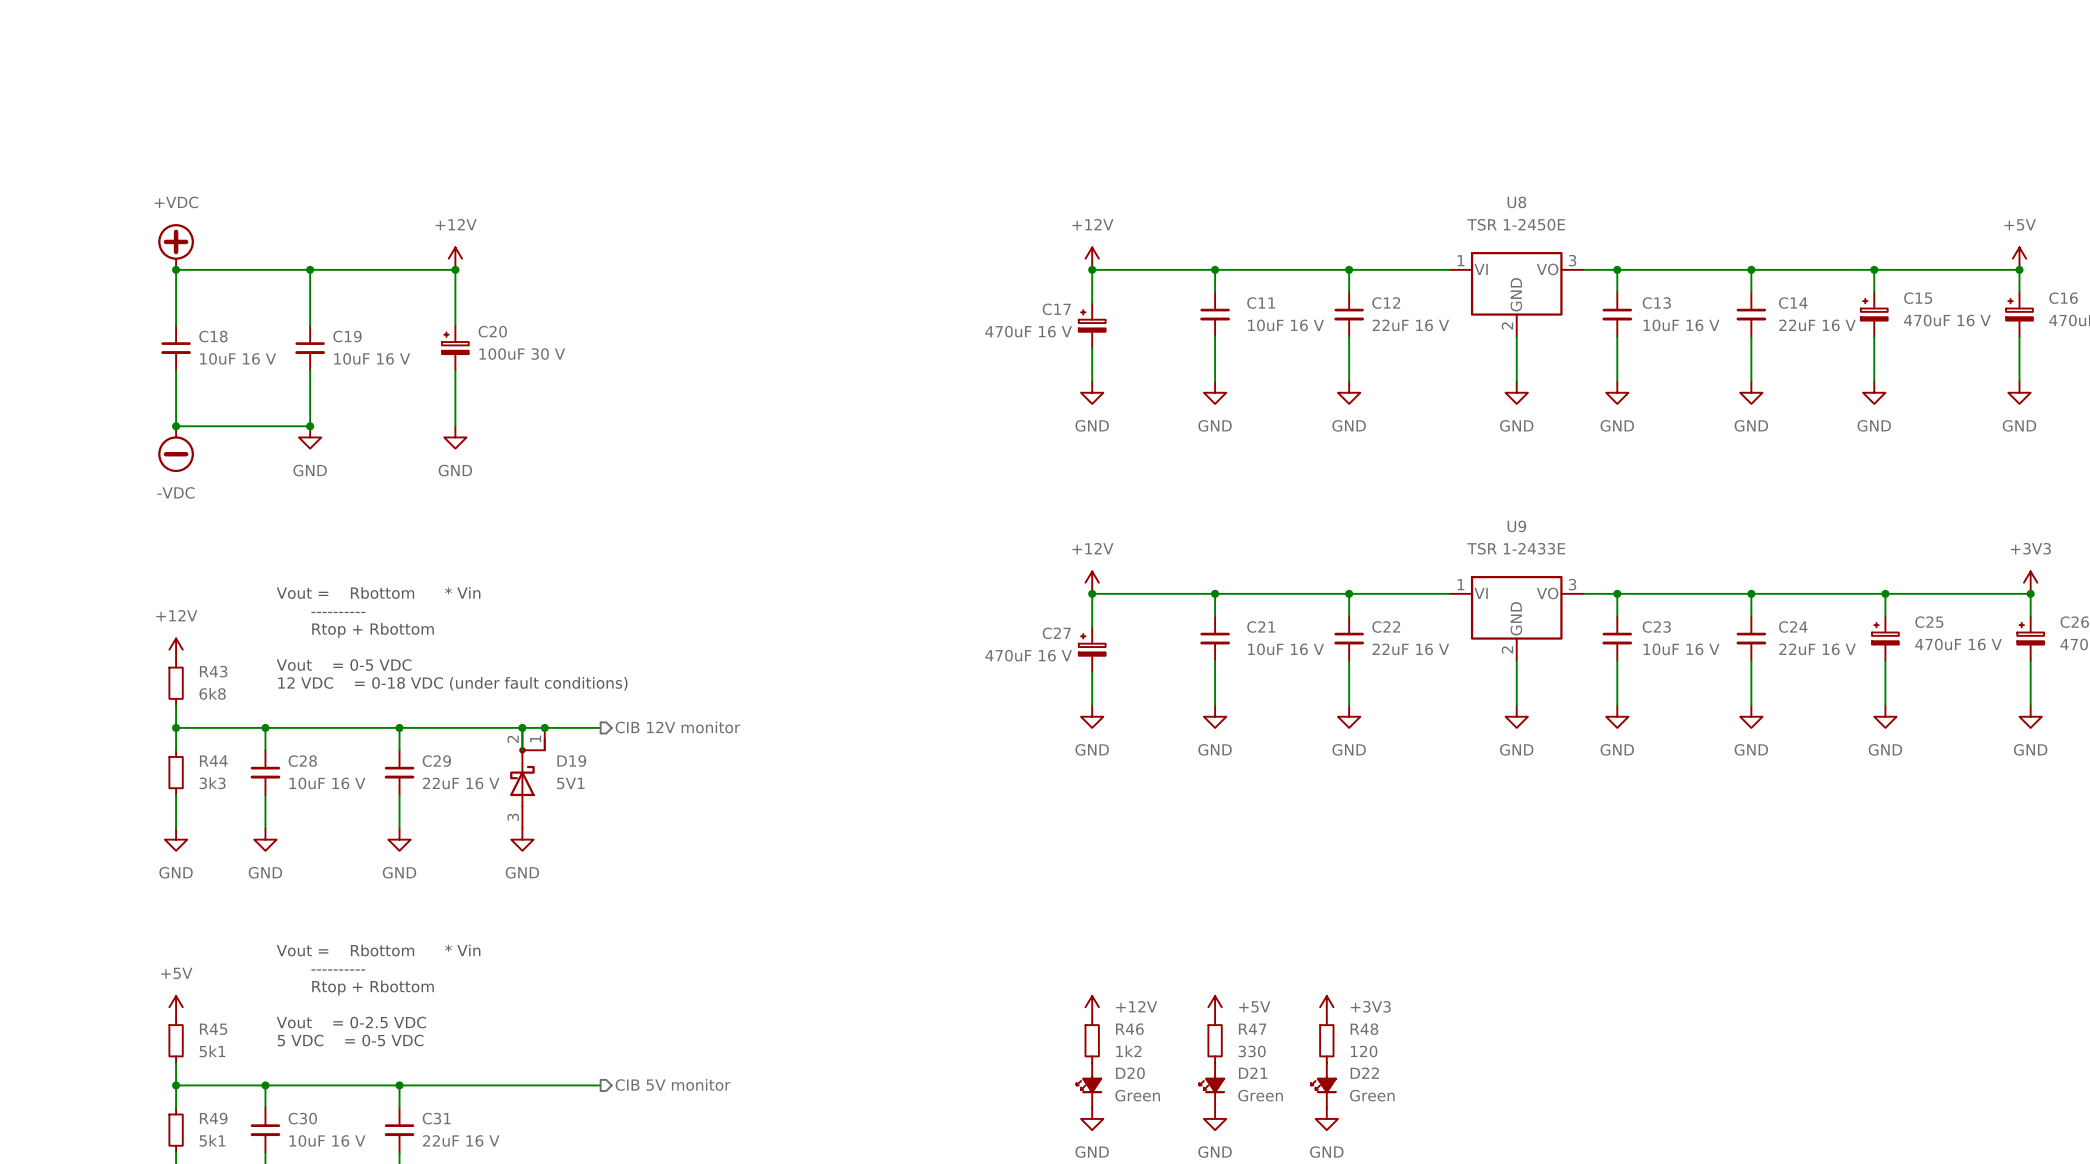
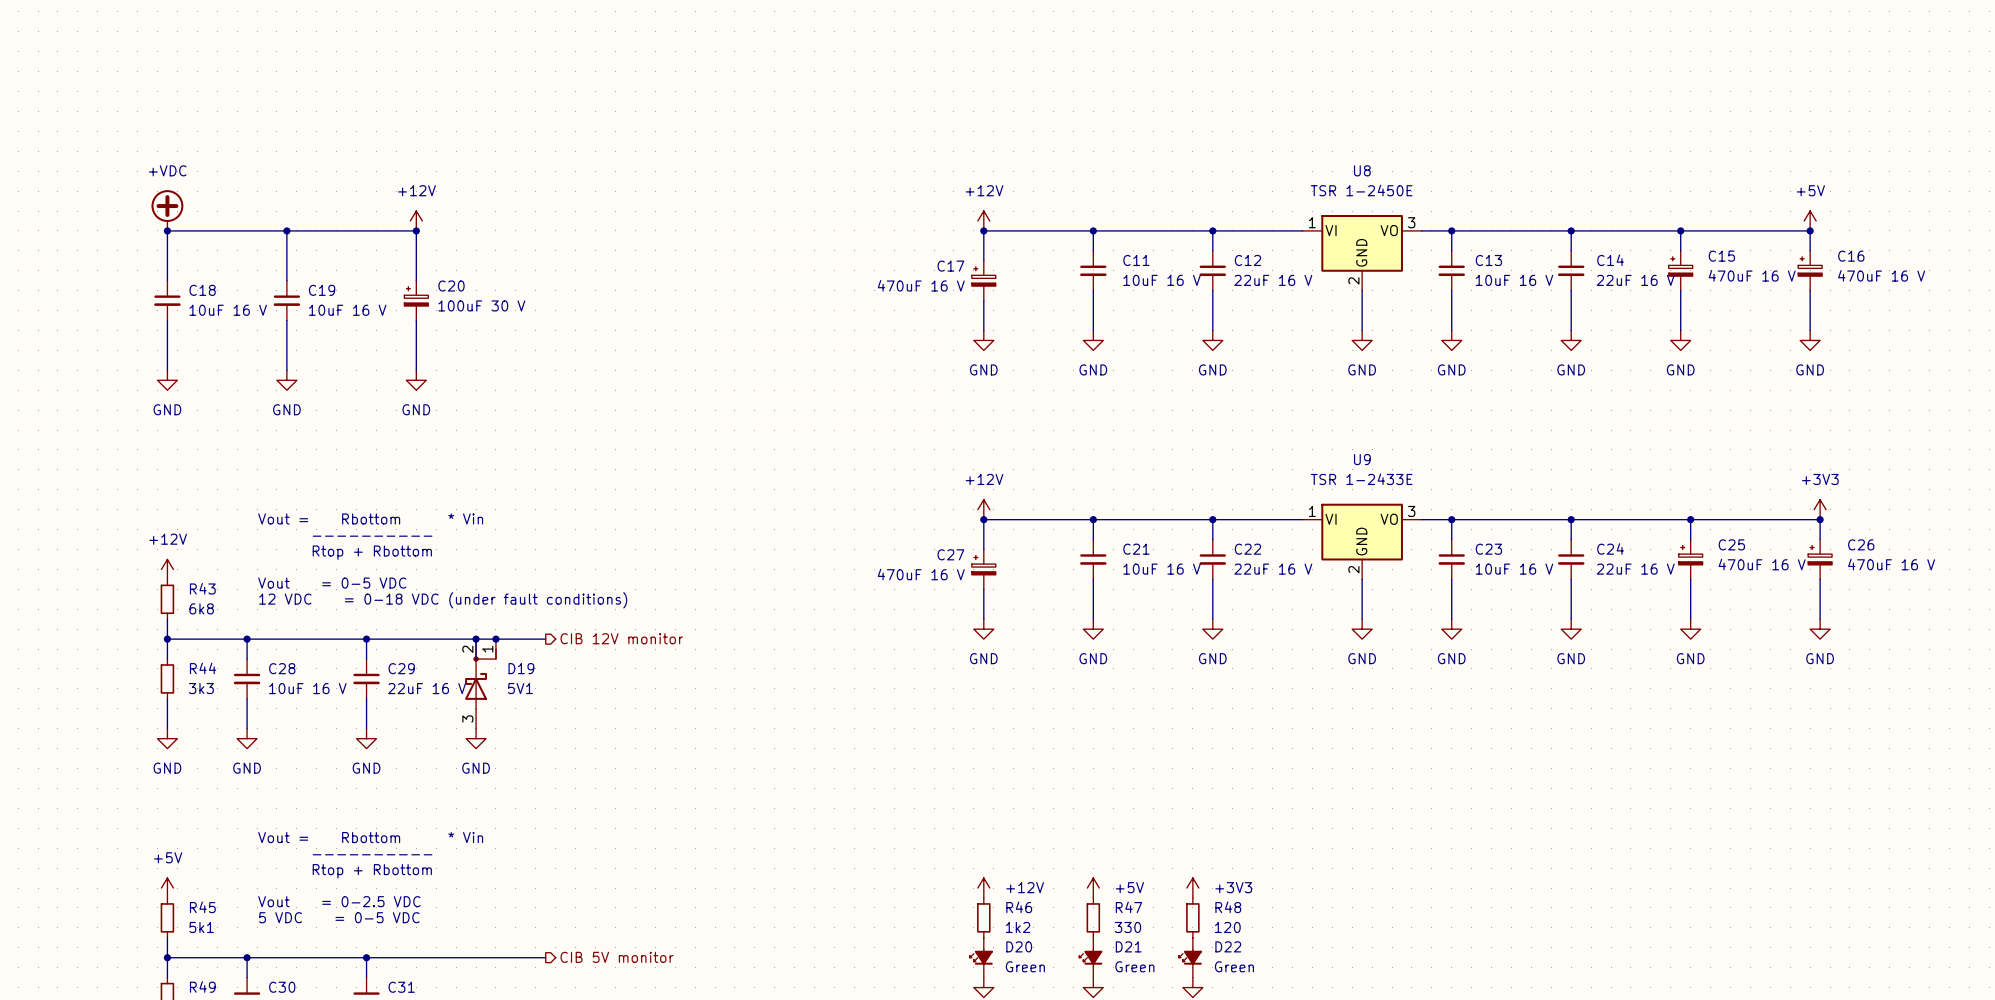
wire: (176, 426) (310, 426) -> none
junction: (176, 426) -> none
junction: (310, 426) -> none
power symbol: none -> GND (167, 380)
power symbol: -VDC (176, 449) -> none

